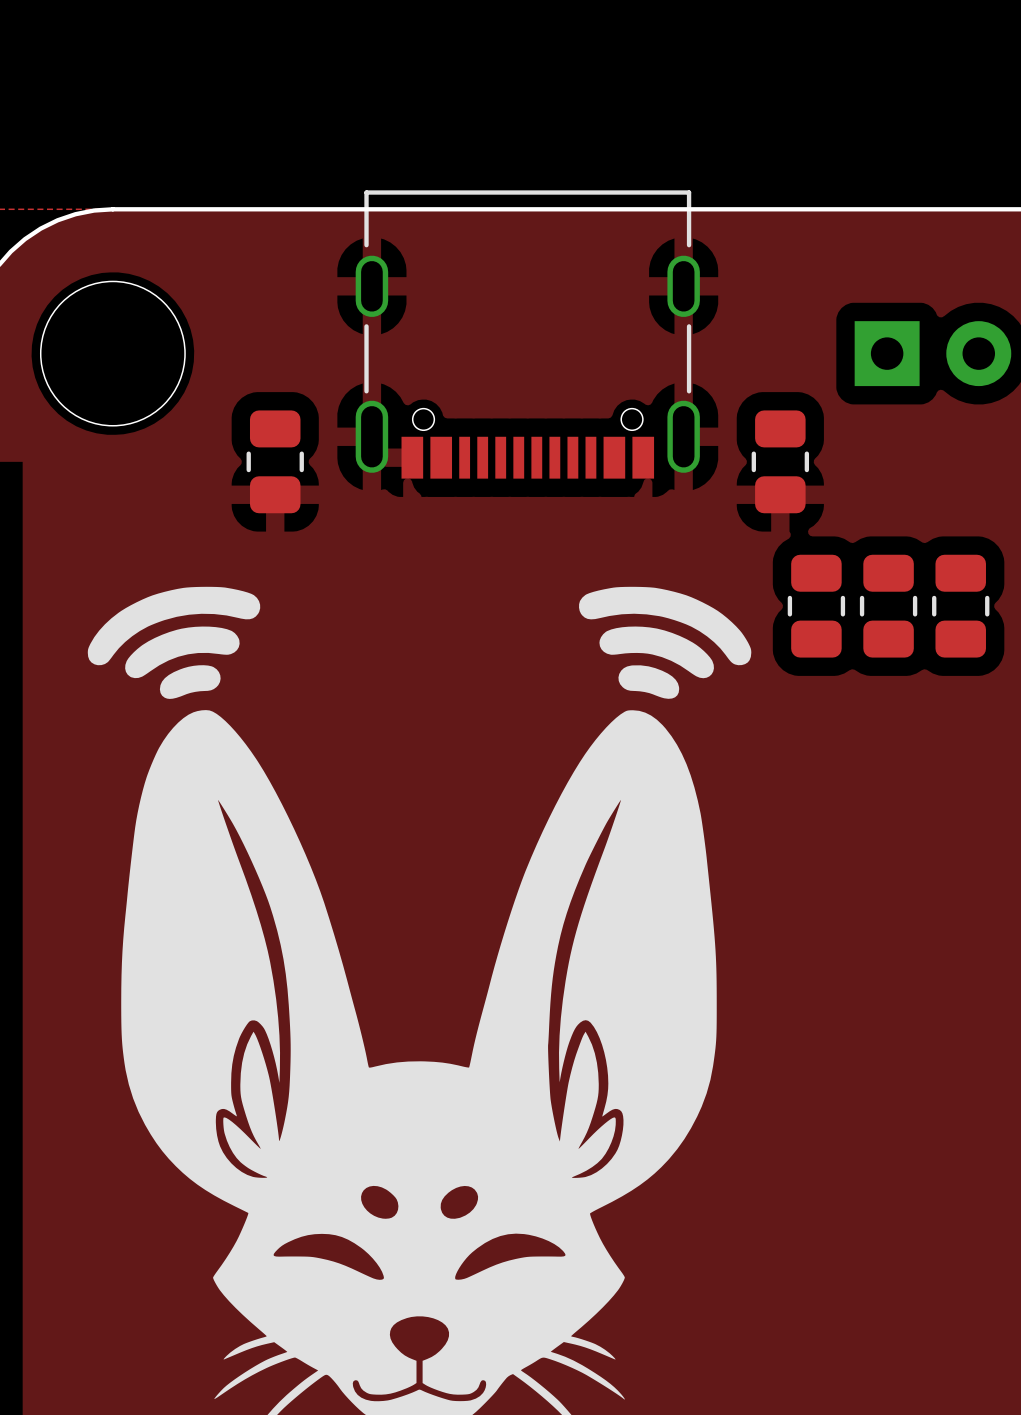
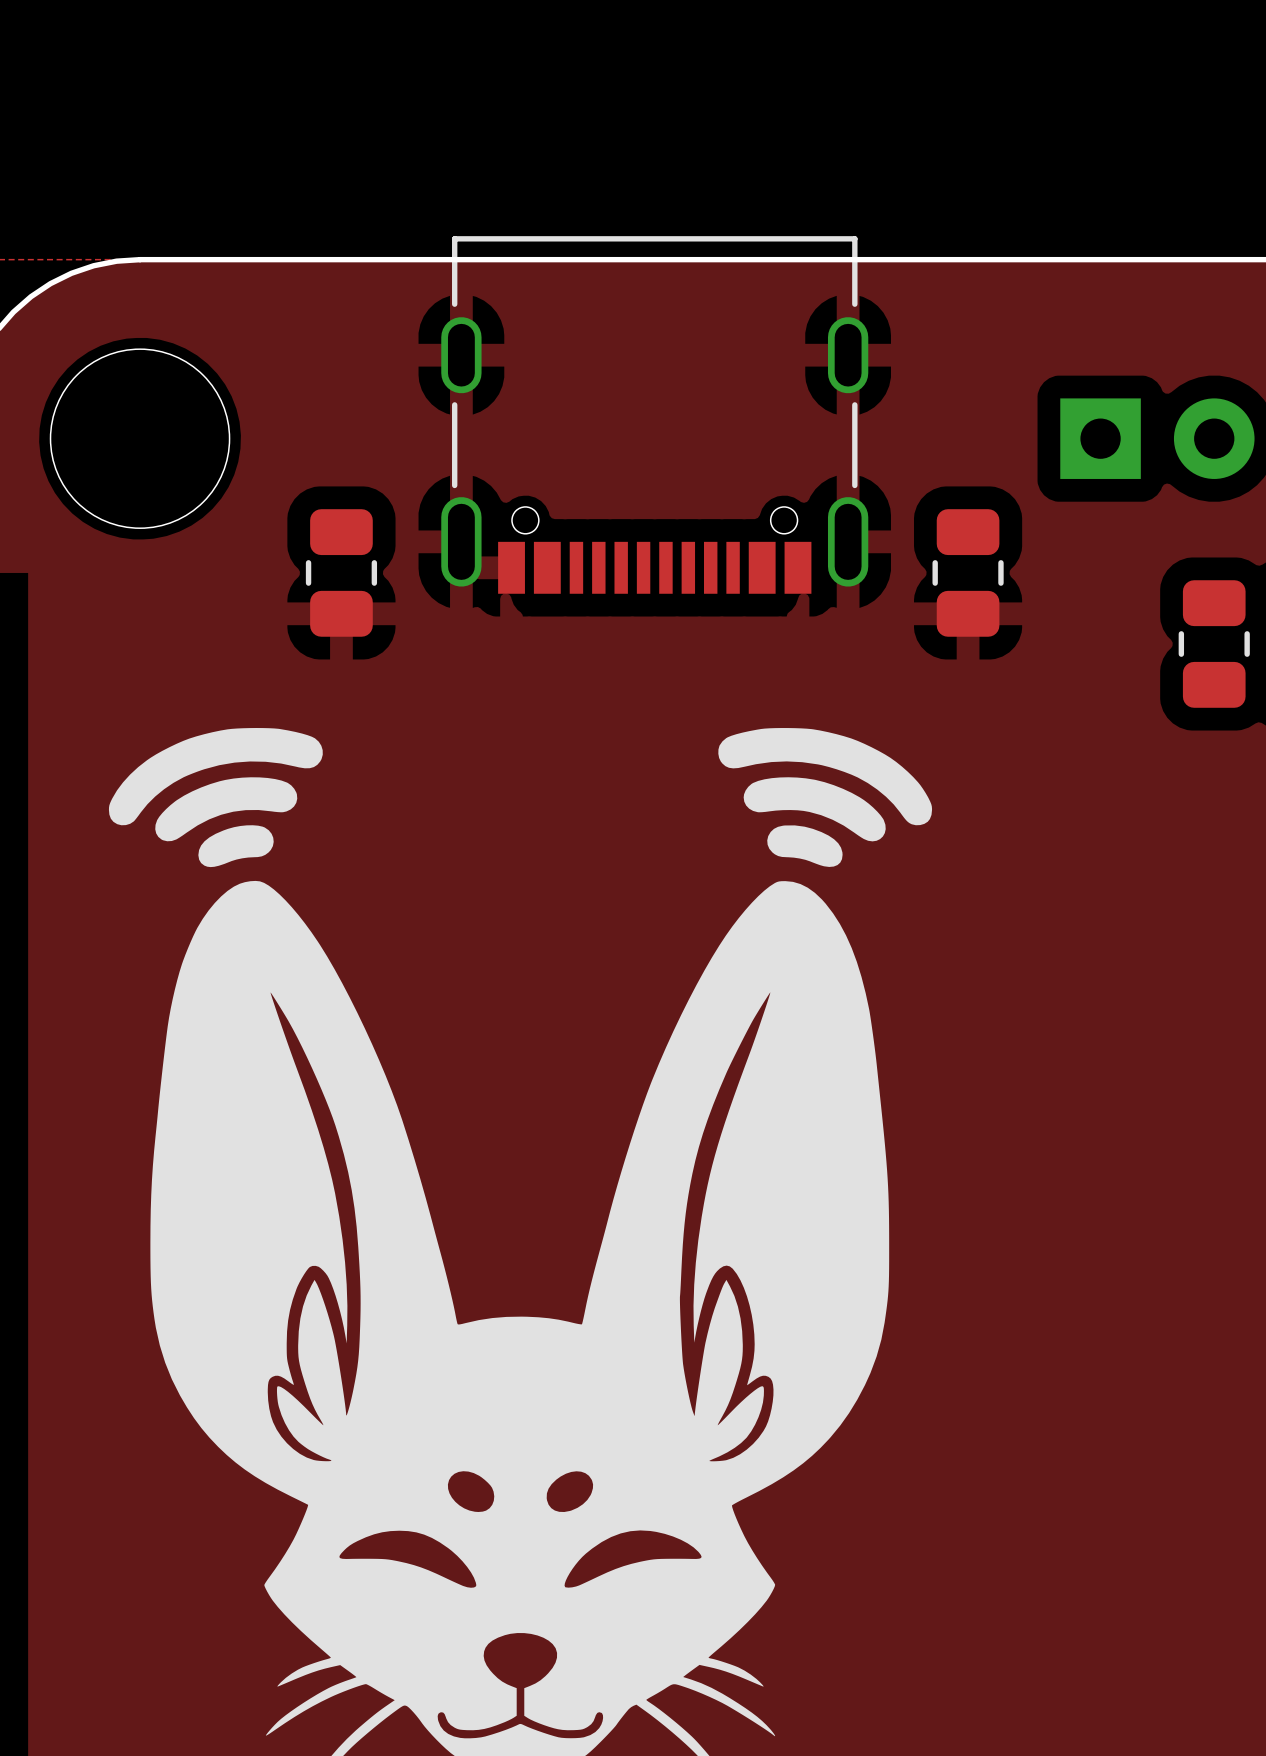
part: none -> (1214, 644)
part: (816, 606) -> none
part: (888, 606) -> none
part: (960, 606) -> none

